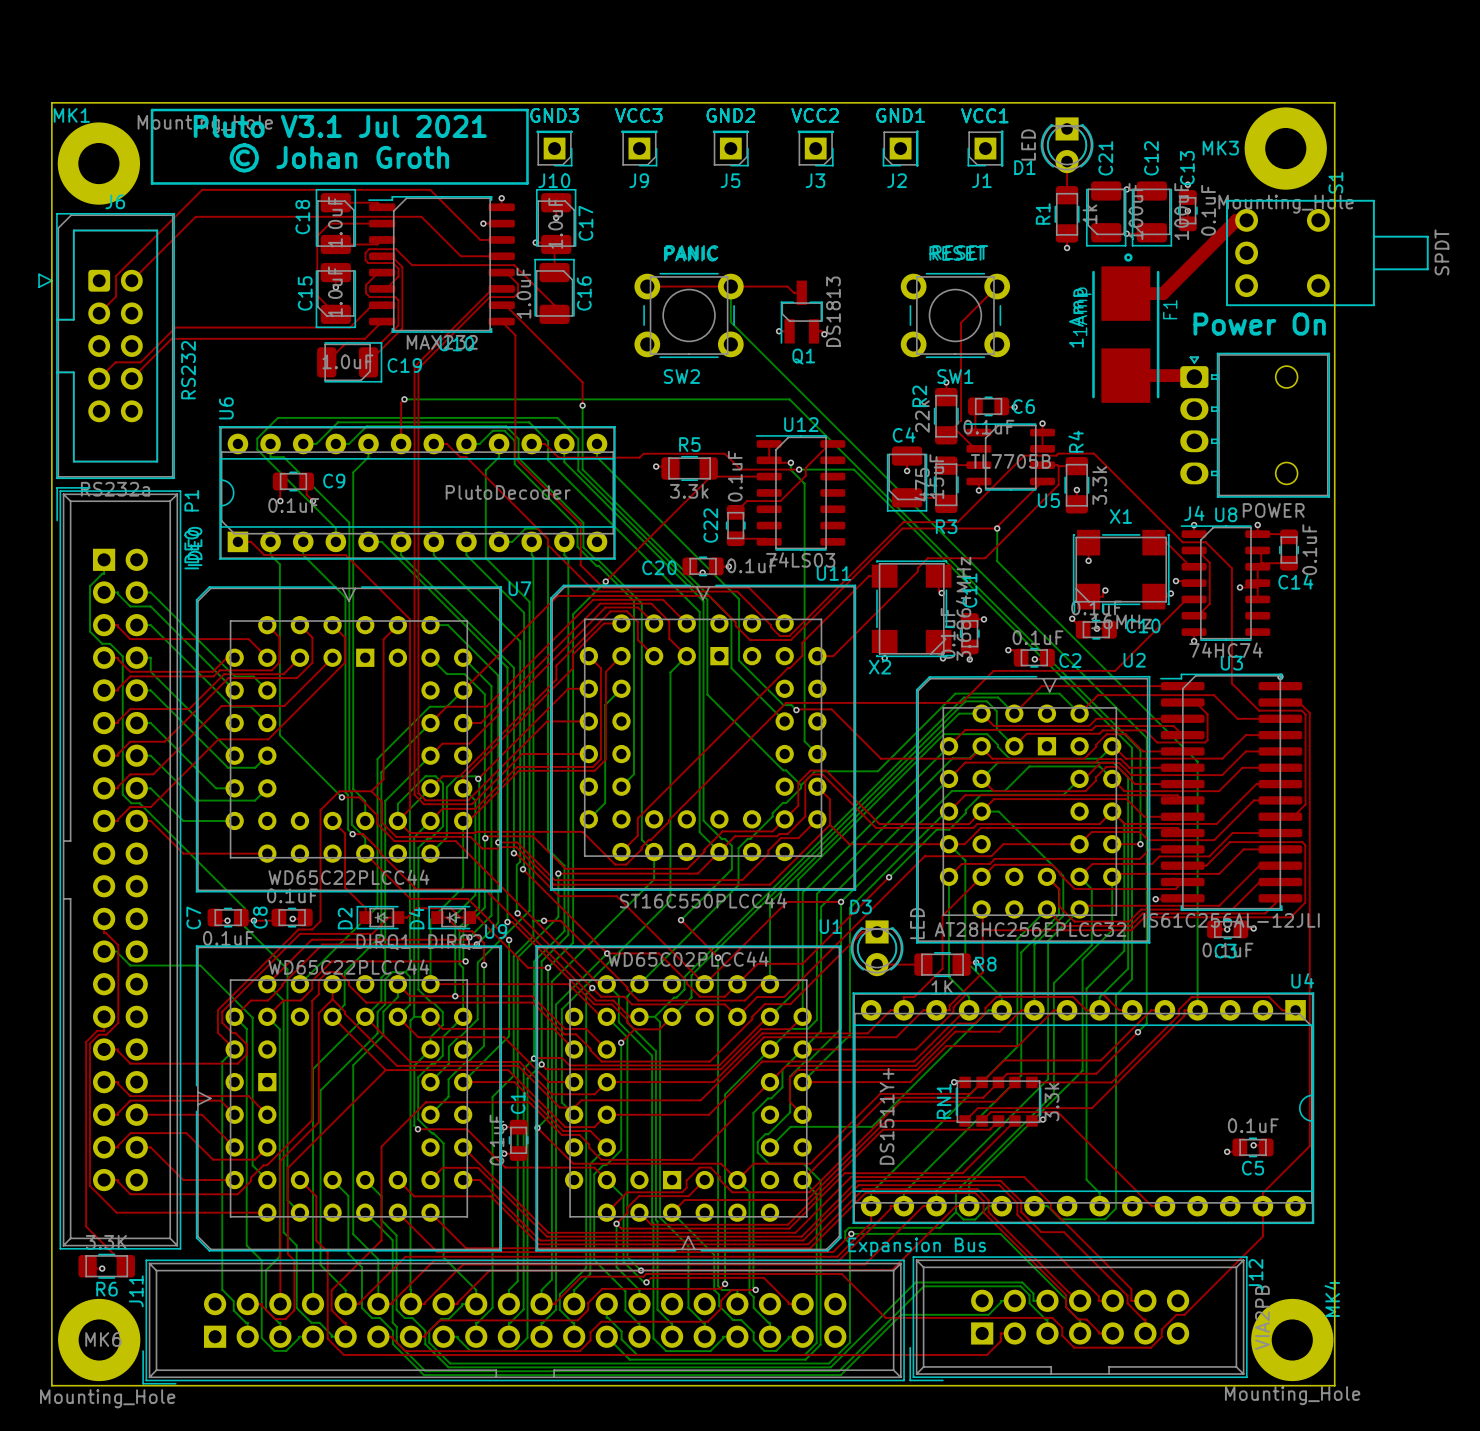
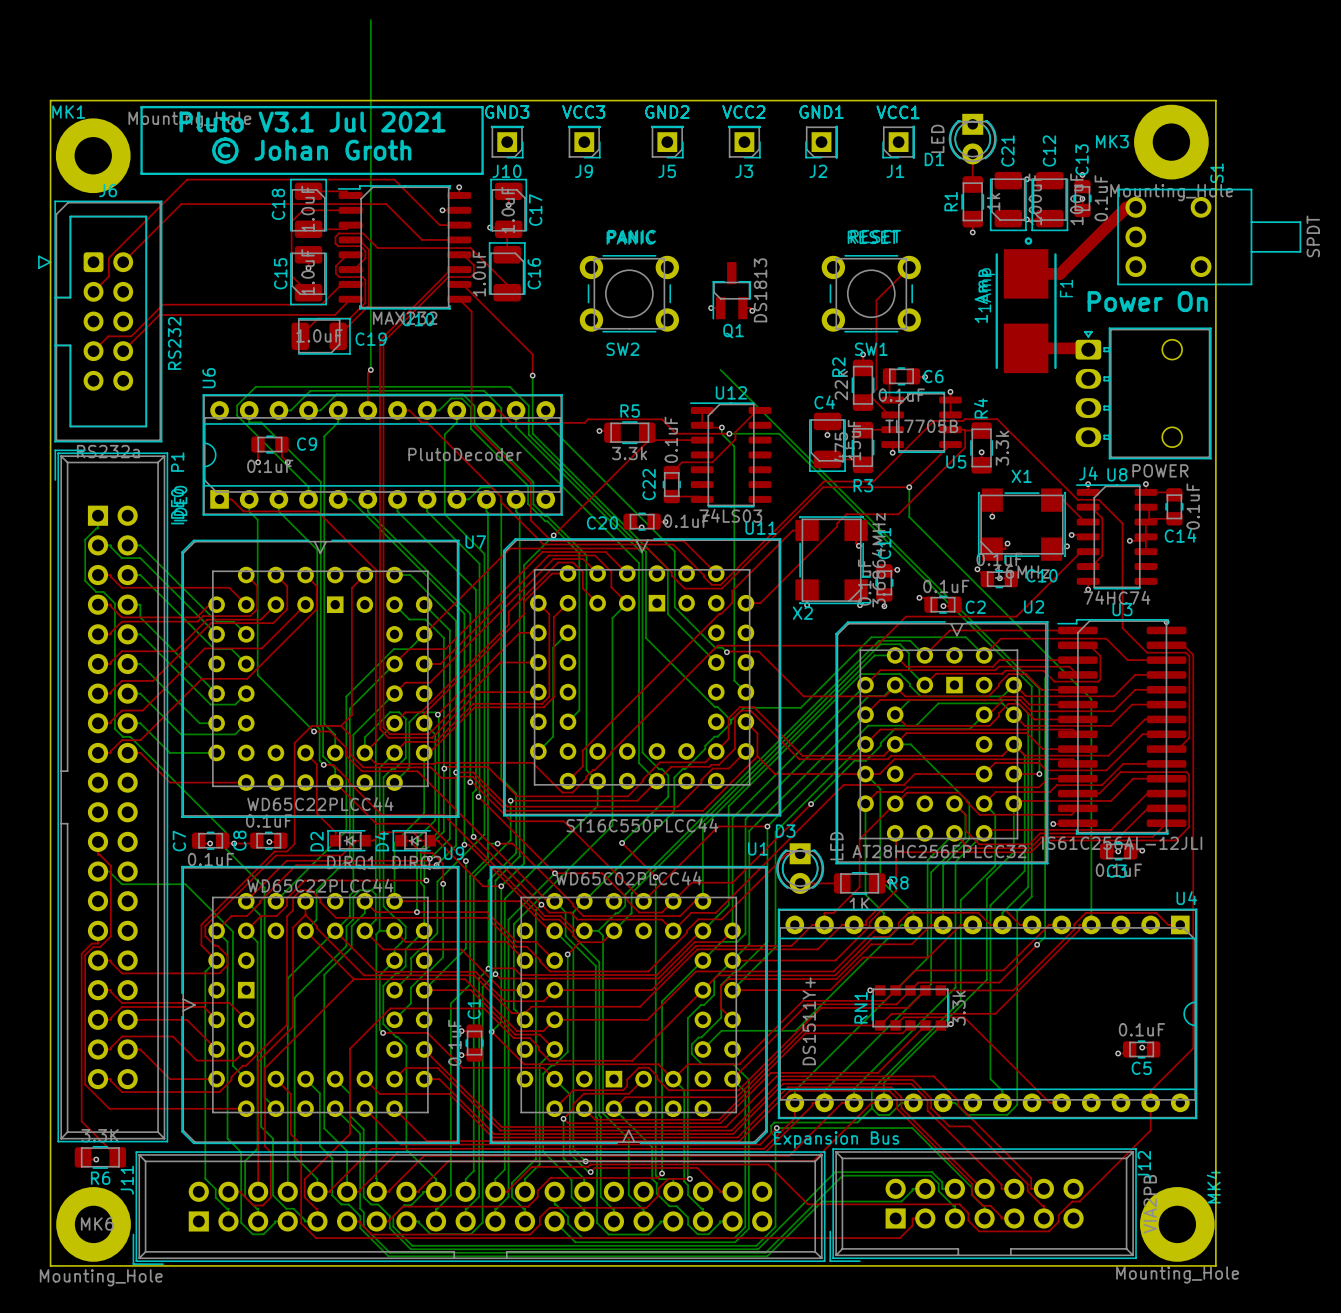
top track: (647, 286) (787, 286) (793, 292) (801, 292) -> none
bottom track: (730, 286) (730, 322) (1146, 738) -> none
bottom track: (404, 399) (789, 399) -> (370, 369) (370, 20)

